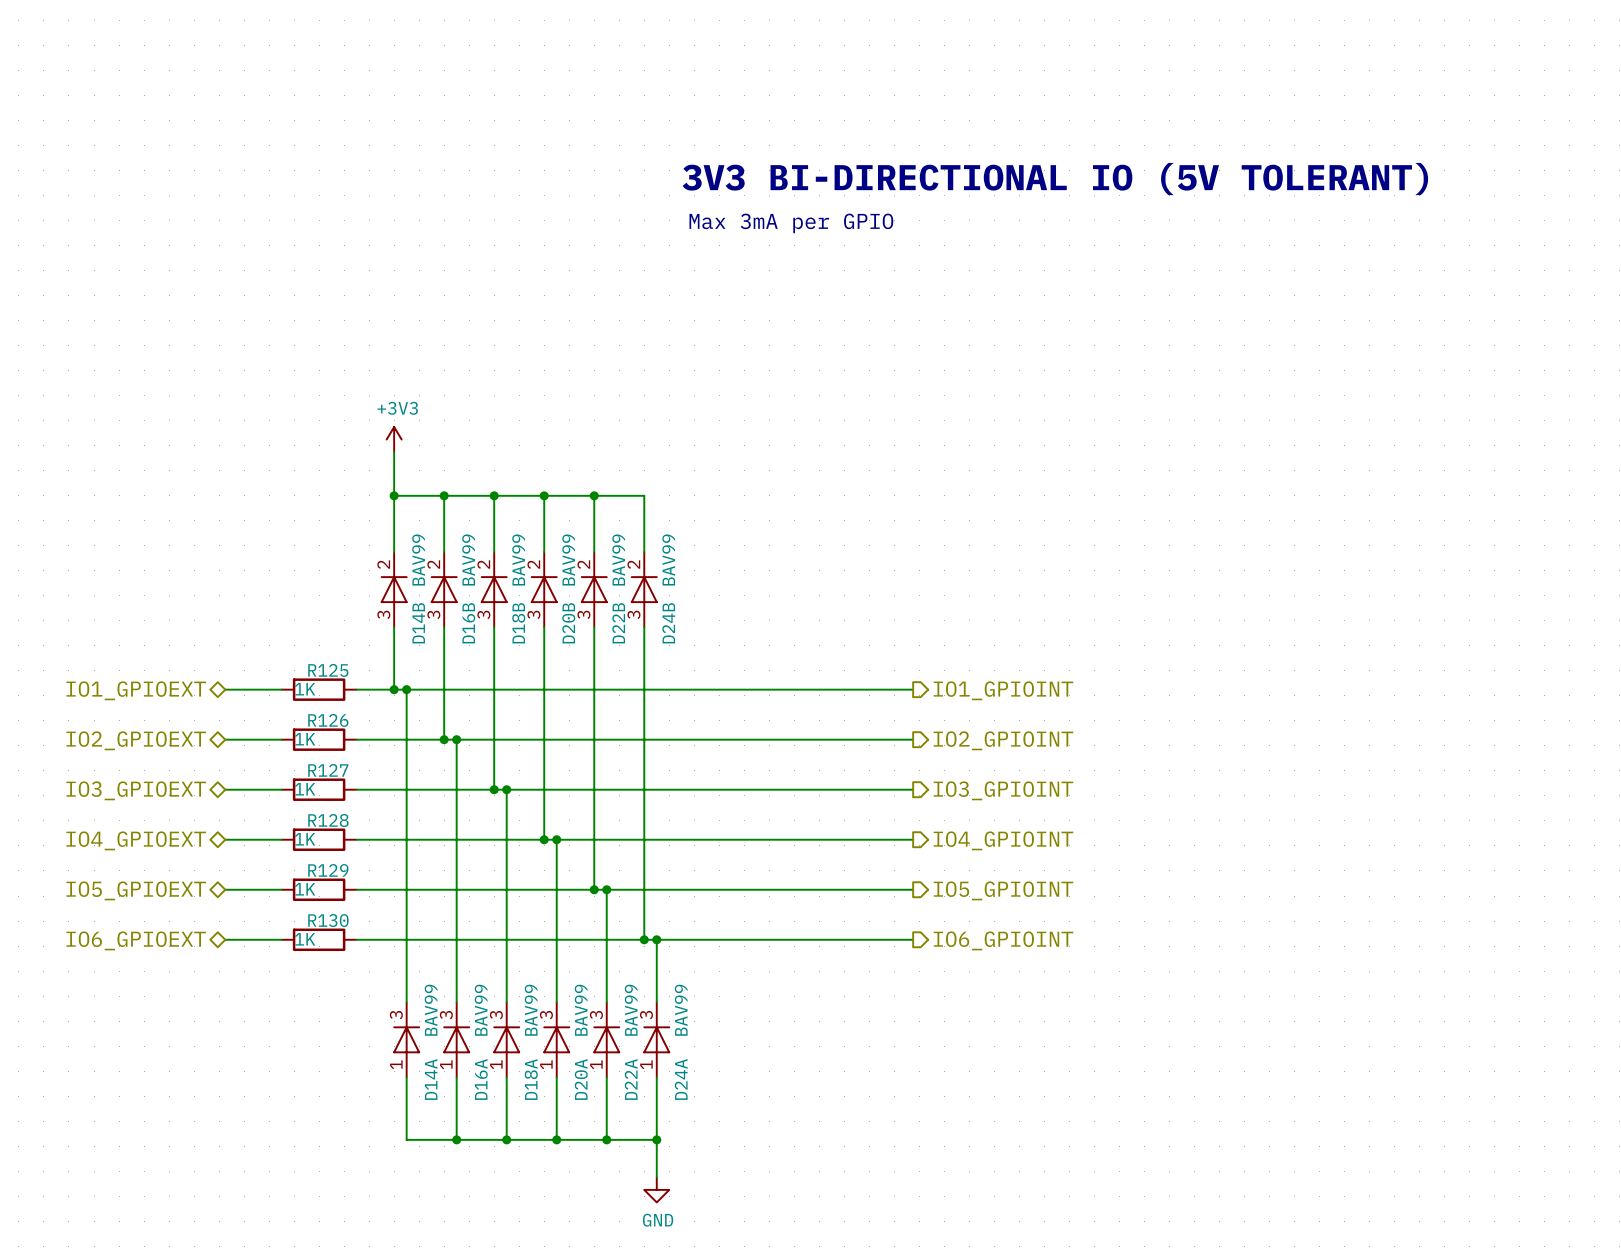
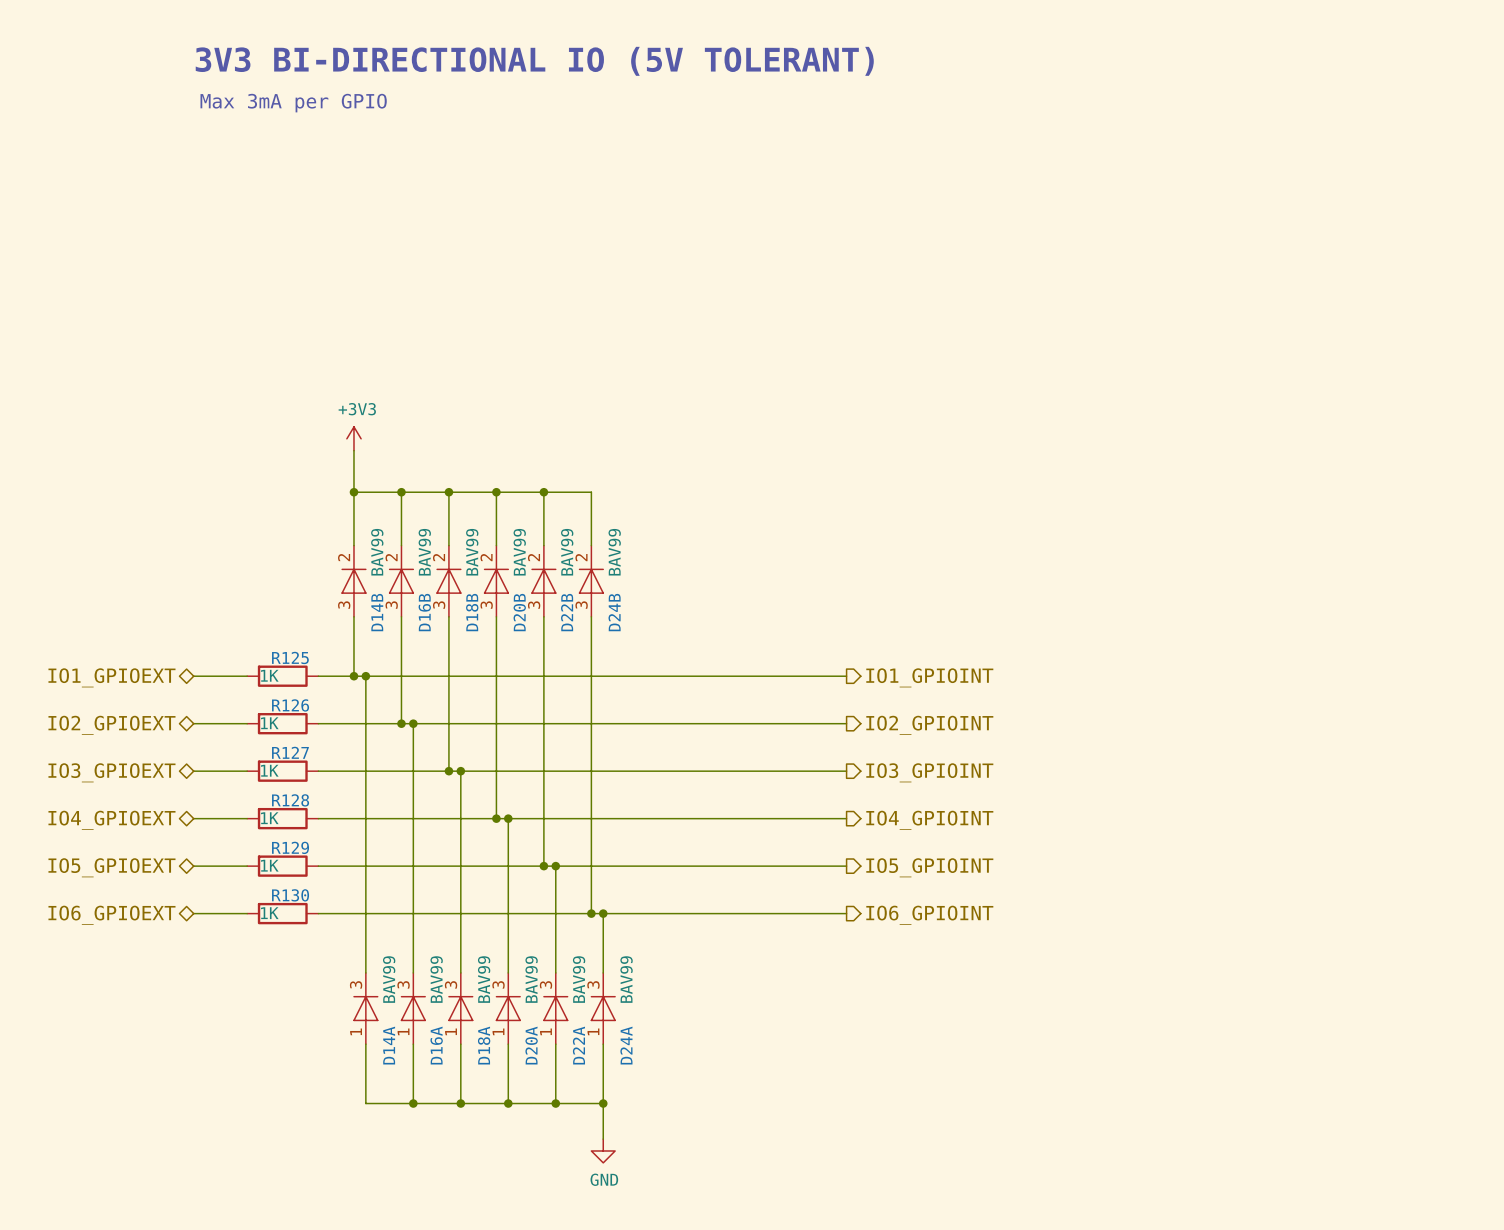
text: none -> 3V3 BI-DIRECTIONAL IO (5V TOLERANT) (534, 61)
text: none -> Max 3mA per GPIO (293, 103)
text: 3V3 BI-DIRECTIONAL IO (5V TOLERANT) (1055, 179) -> none
text: Max 3mA per GPIO (791, 223) -> none

